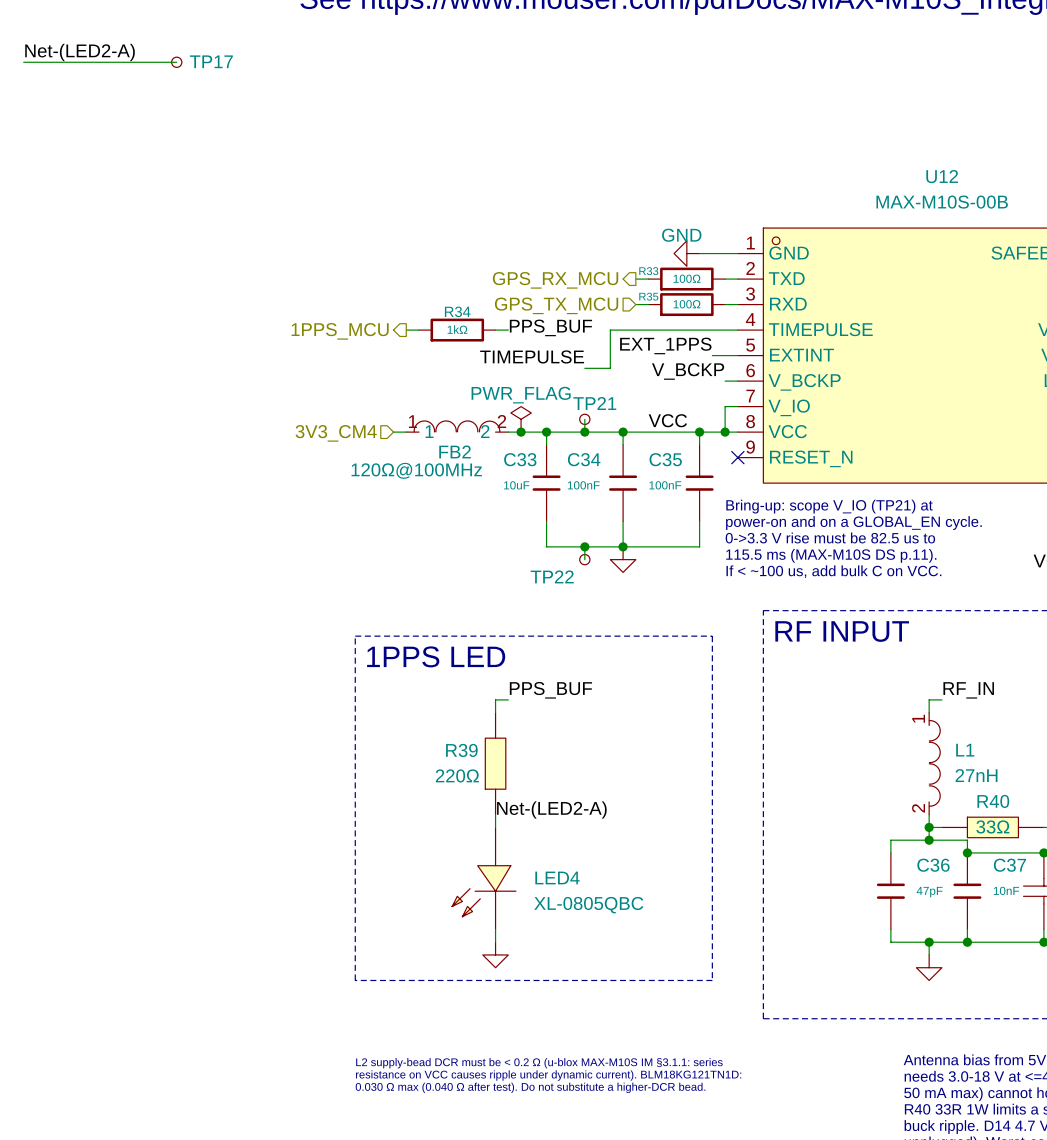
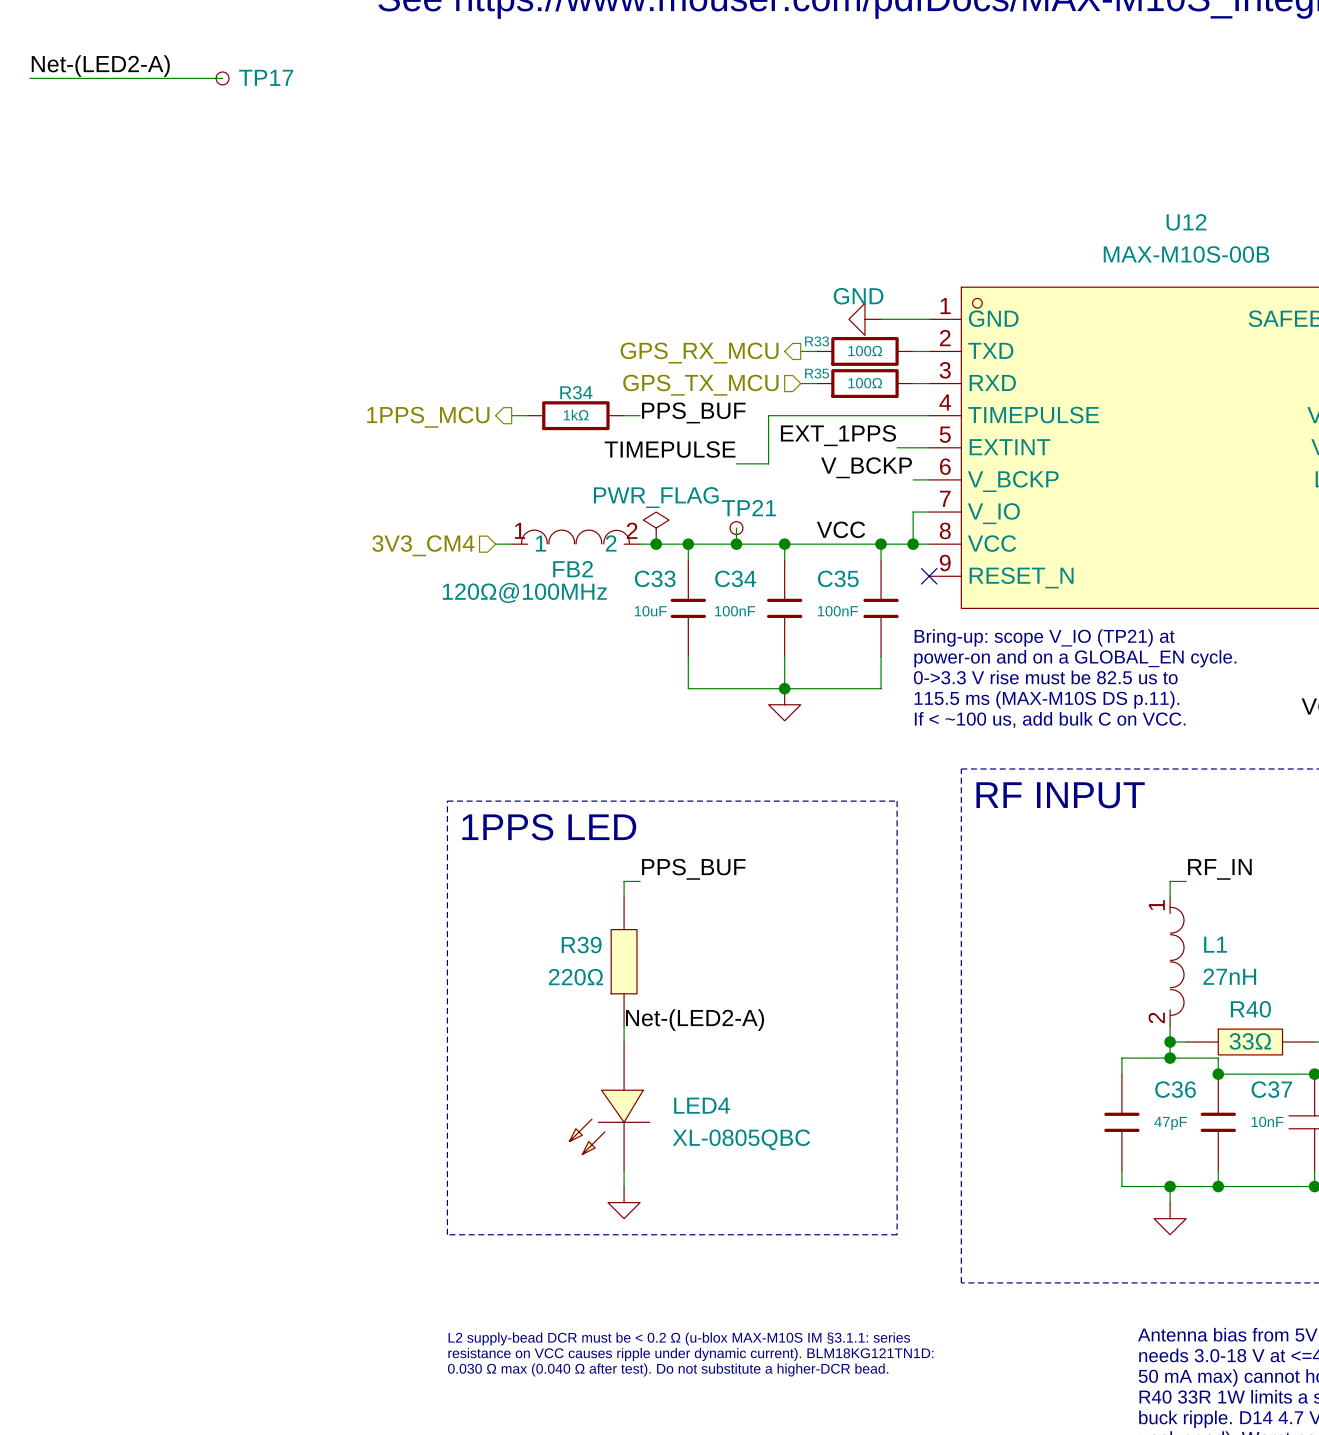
wire: (584, 546) (584, 559) -> none
junction: (584, 546) -> none
TP22: (584, 559) -> none

